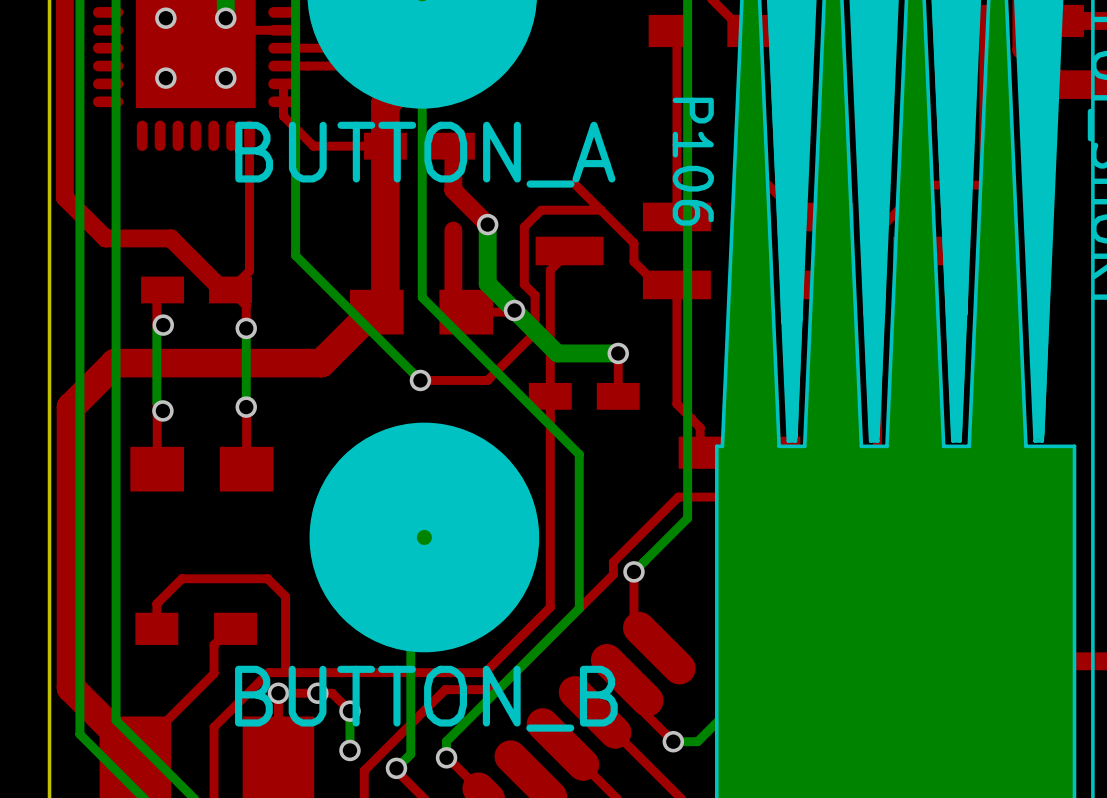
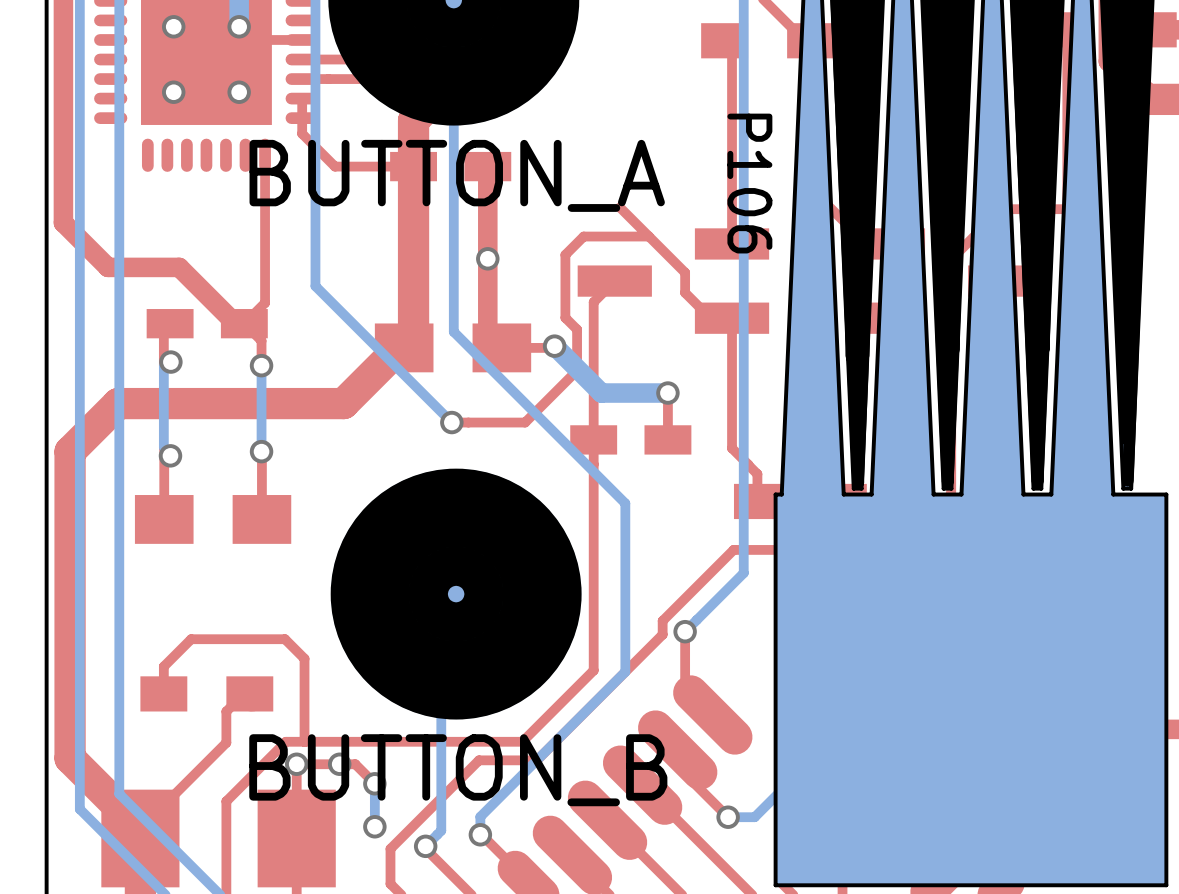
top track: (453, 190) (487, 224) -> (487, 214) (487, 258)
bottom track: (487, 224) (487, 283) (514, 310) -> none
via position: (487, 224) -> (487, 258)

